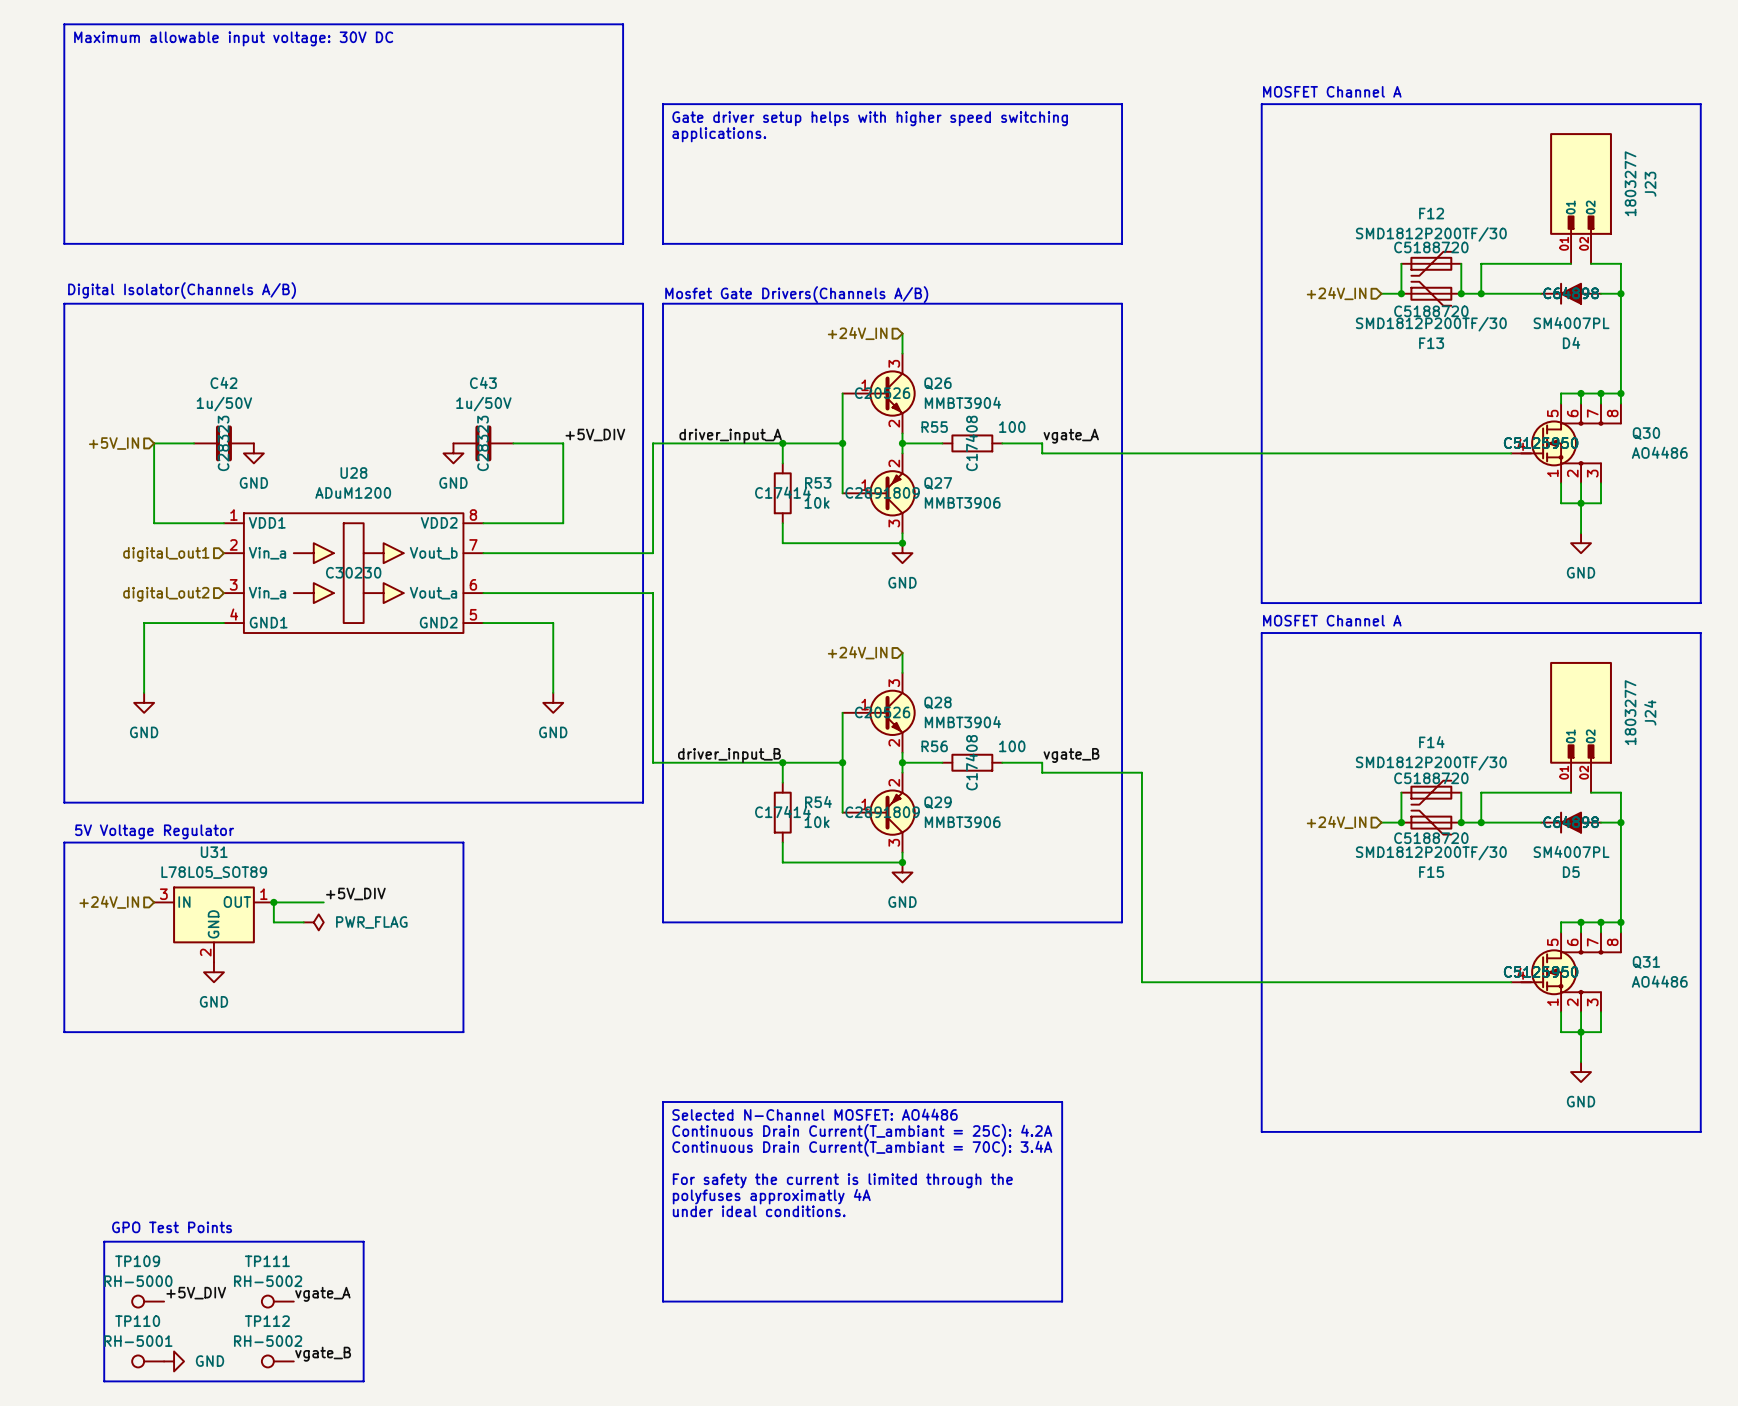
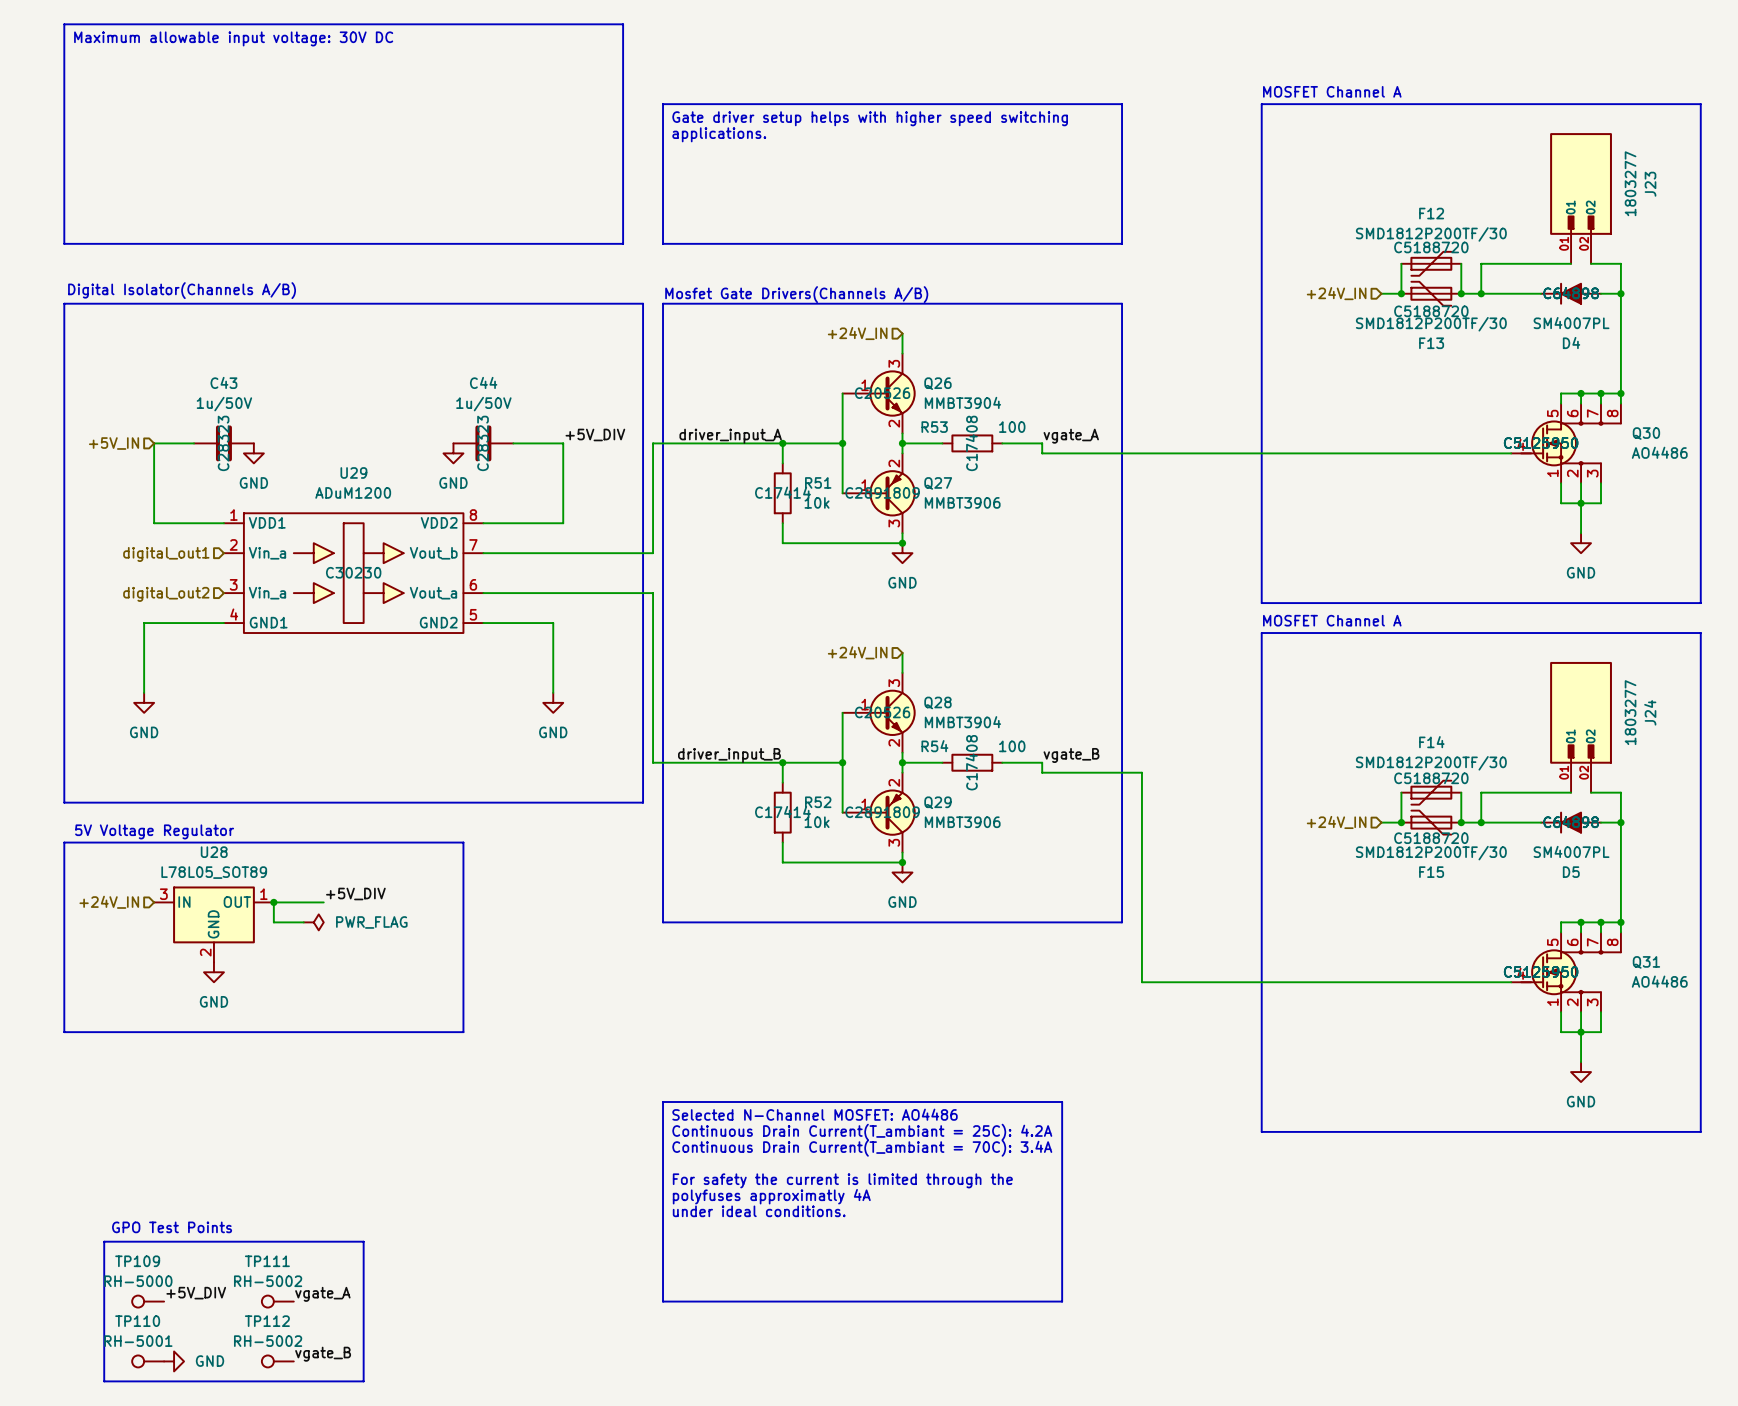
C42 name: C42 (223, 382) -> C43 (223, 382)
C43 name: C43 (483, 382) -> C44 (483, 382)
R55 name: R55 (934, 427) -> R53 (934, 427)
U28 name: U28 (353, 472) -> U29 (353, 472)
R53 name: R53 (818, 482) -> R51 (818, 482)
R56 name: R56 (934, 746) -> R54 (934, 746)
R54 name: R54 (818, 802) -> R52 (818, 802)
U31 name: U31 (214, 852) -> U28 (214, 852)

